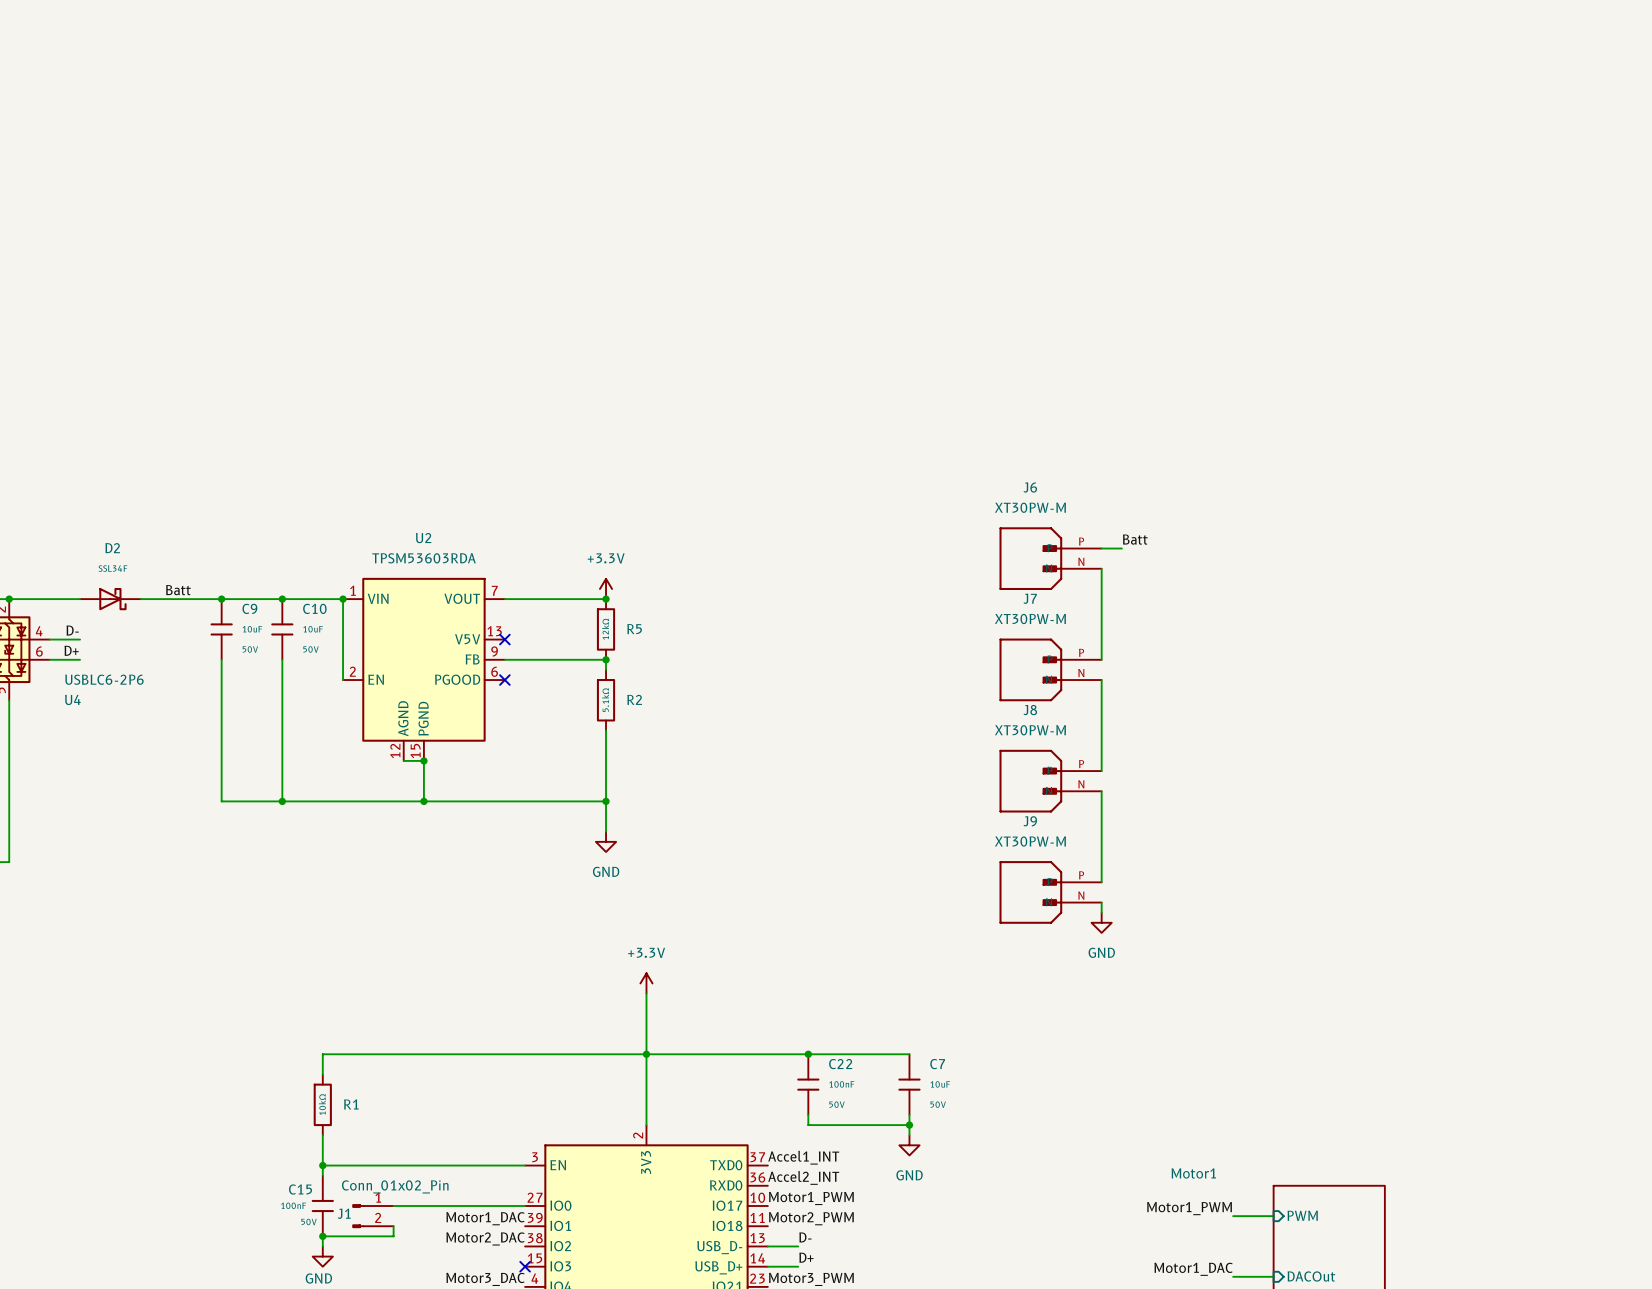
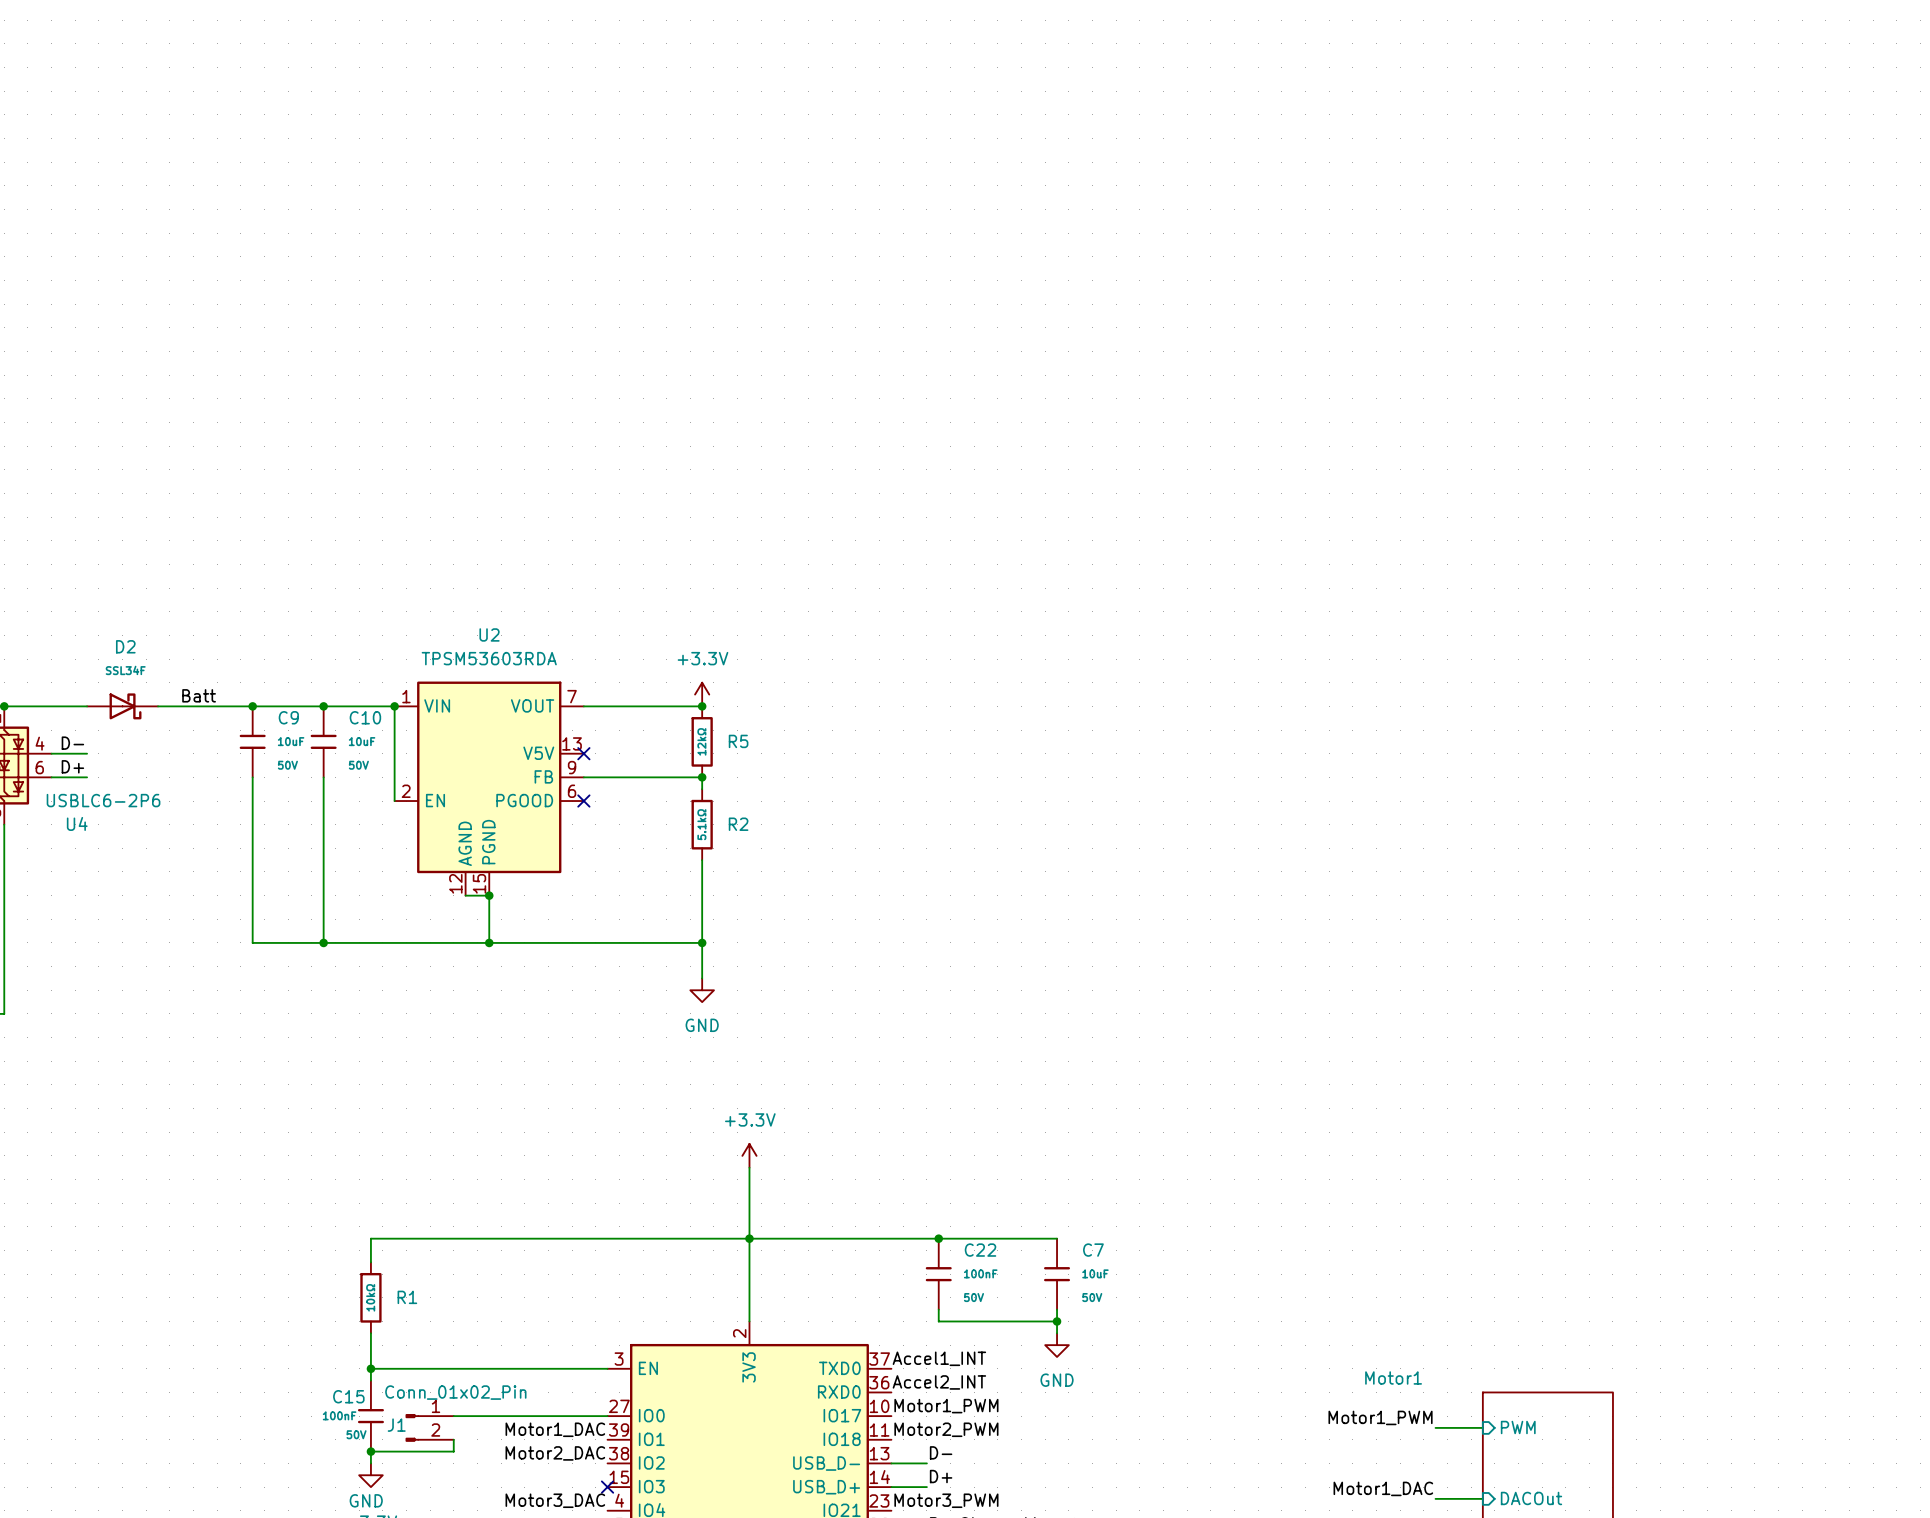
label: Batt (1135, 539) -> none
wire: (1101, 548) (1121, 548) -> none
J6: XT30PW-M (1050, 558) -> none
wire: (1101, 568) (1101, 659) -> none
J7: XT30PW-M (1050, 669) -> none
wire: (1101, 680) (1101, 771) -> none
J8: XT30PW-M (1050, 781) -> none
wire: (1101, 791) (1101, 882) -> none
J9: XT30PW-M (1050, 892) -> none
wire: (1101, 902) (1101, 912) -> none
power symbol: GND (1101, 922) -> none

